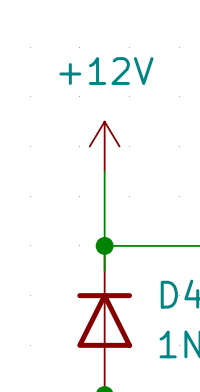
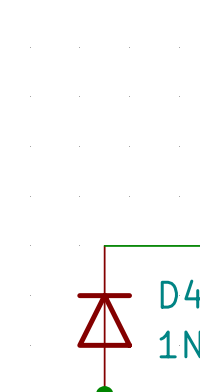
power symbol: +12V (104, 146) -> none
wire: (104, 171) (104, 270) -> none
junction: (104, 245) -> none

